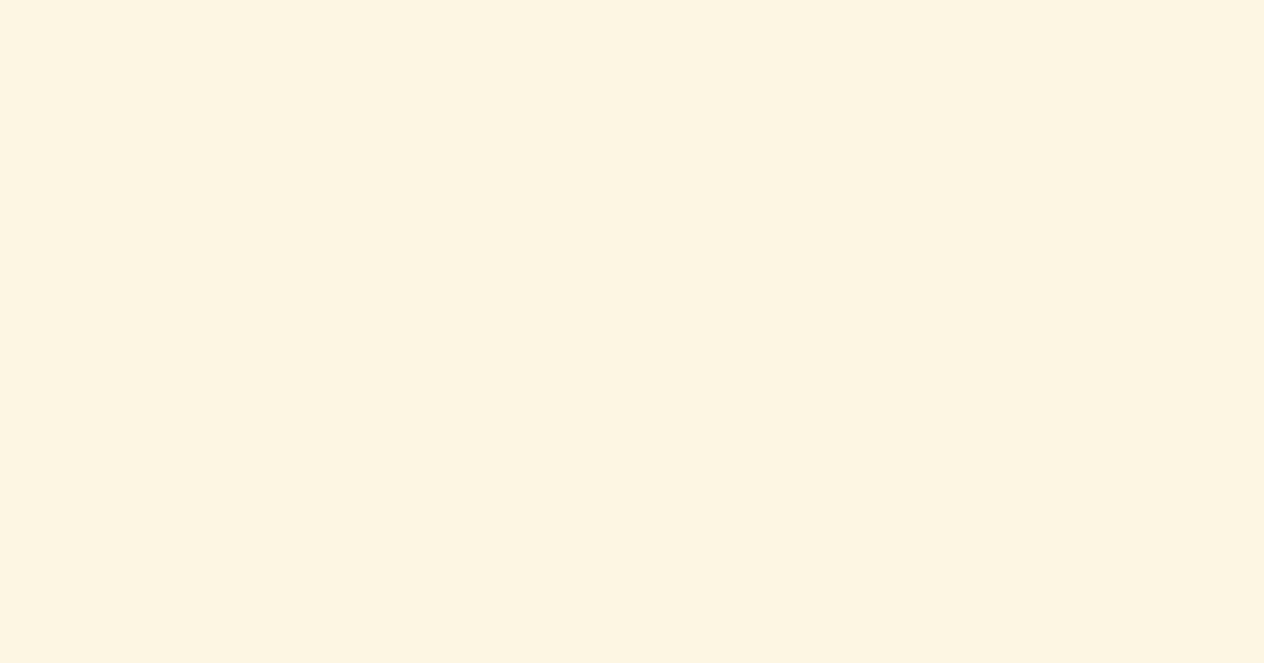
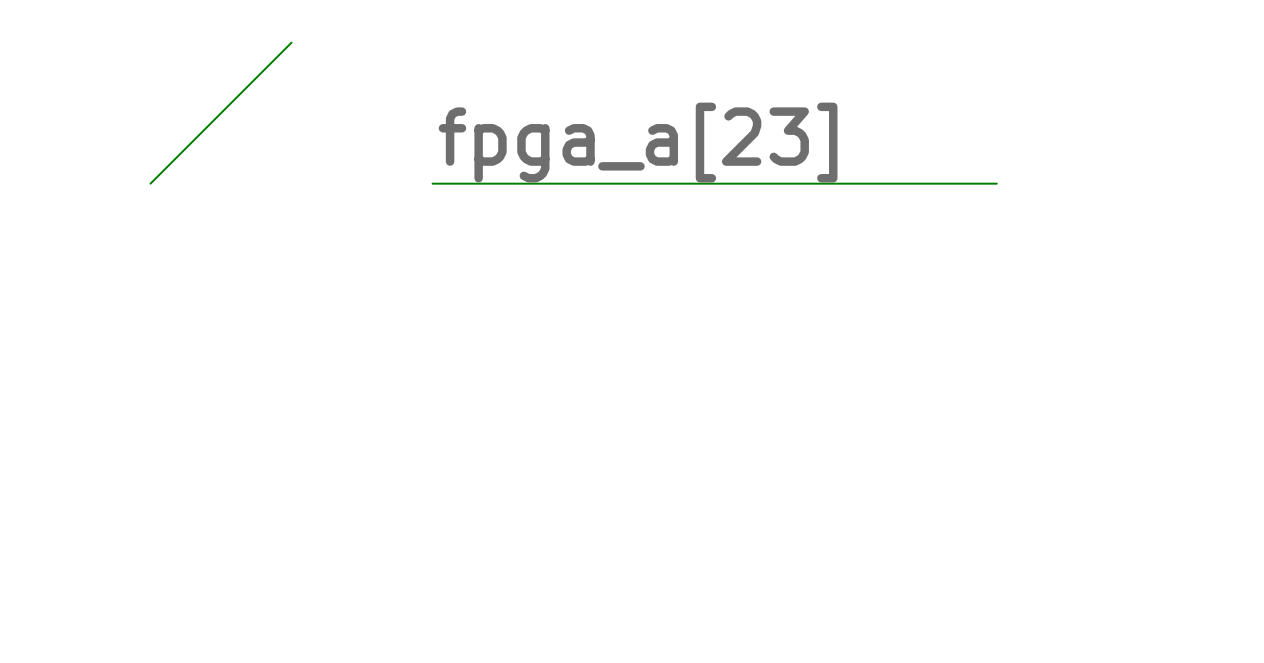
wire: none -> (291, 42) (150, 183)
label: none -> fpga_a[23] (638, 142)
wire: none -> (432, 183) (996, 183)

